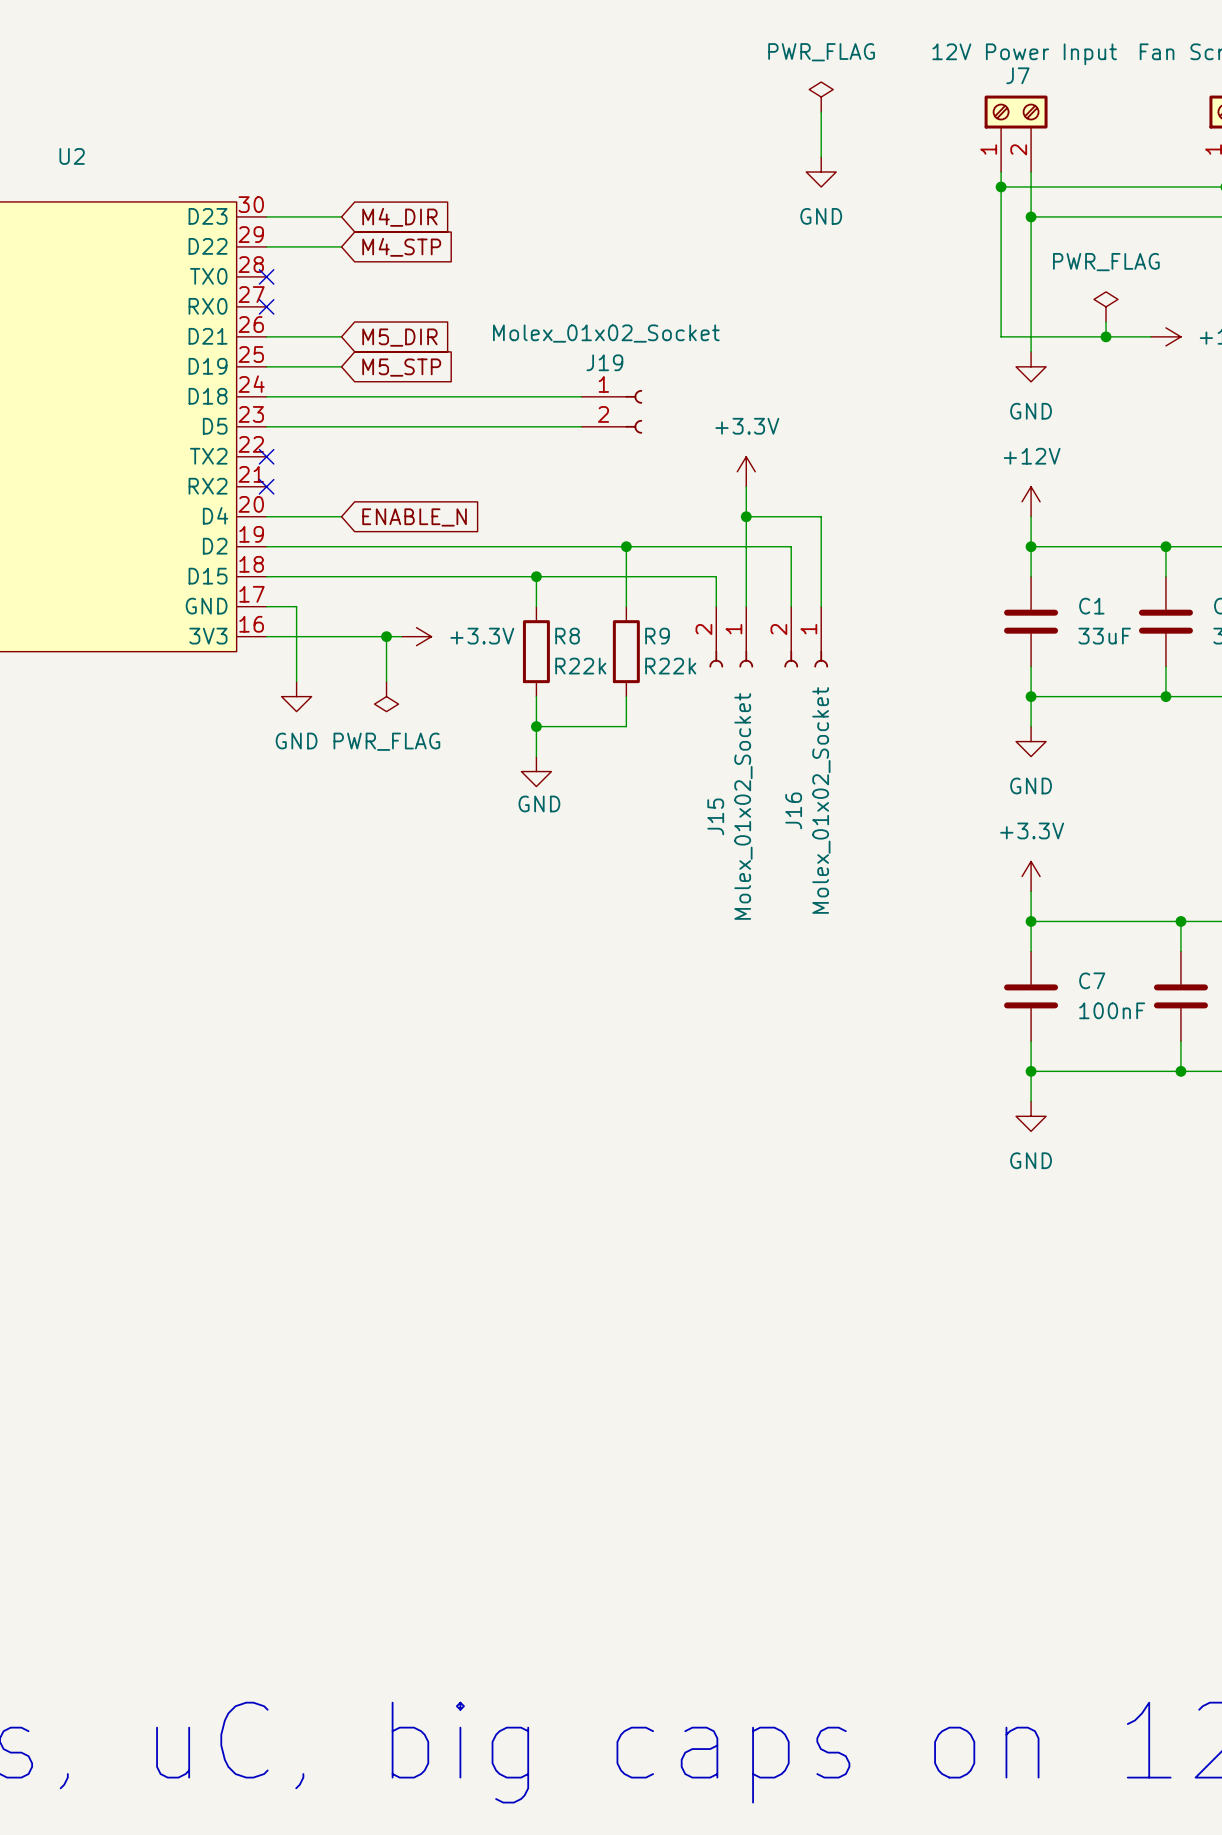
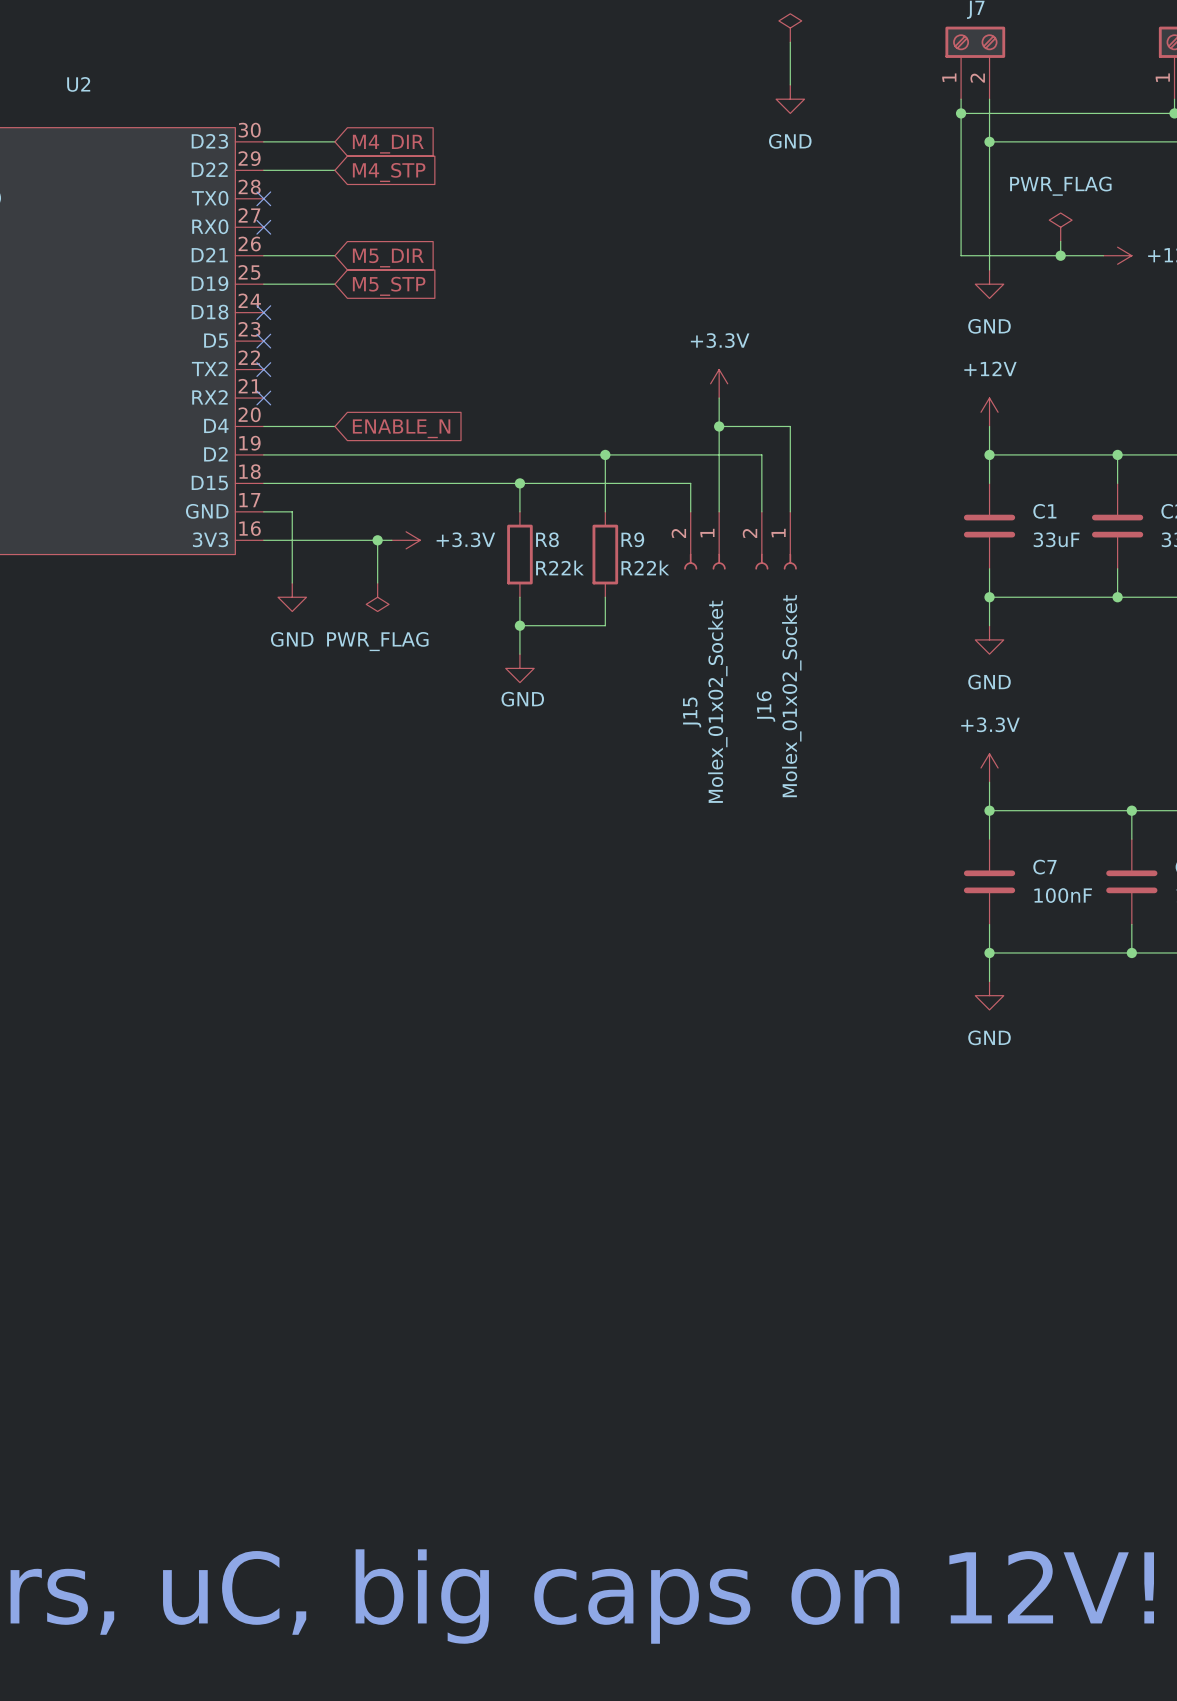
wire: (266, 396) (581, 396) -> none
no-connect mark: none -> (263, 312)
J19: Molex_01x02_Socket (611, 411) -> none
wire: (266, 426) (581, 426) -> none
no-connect mark: none -> (263, 341)

